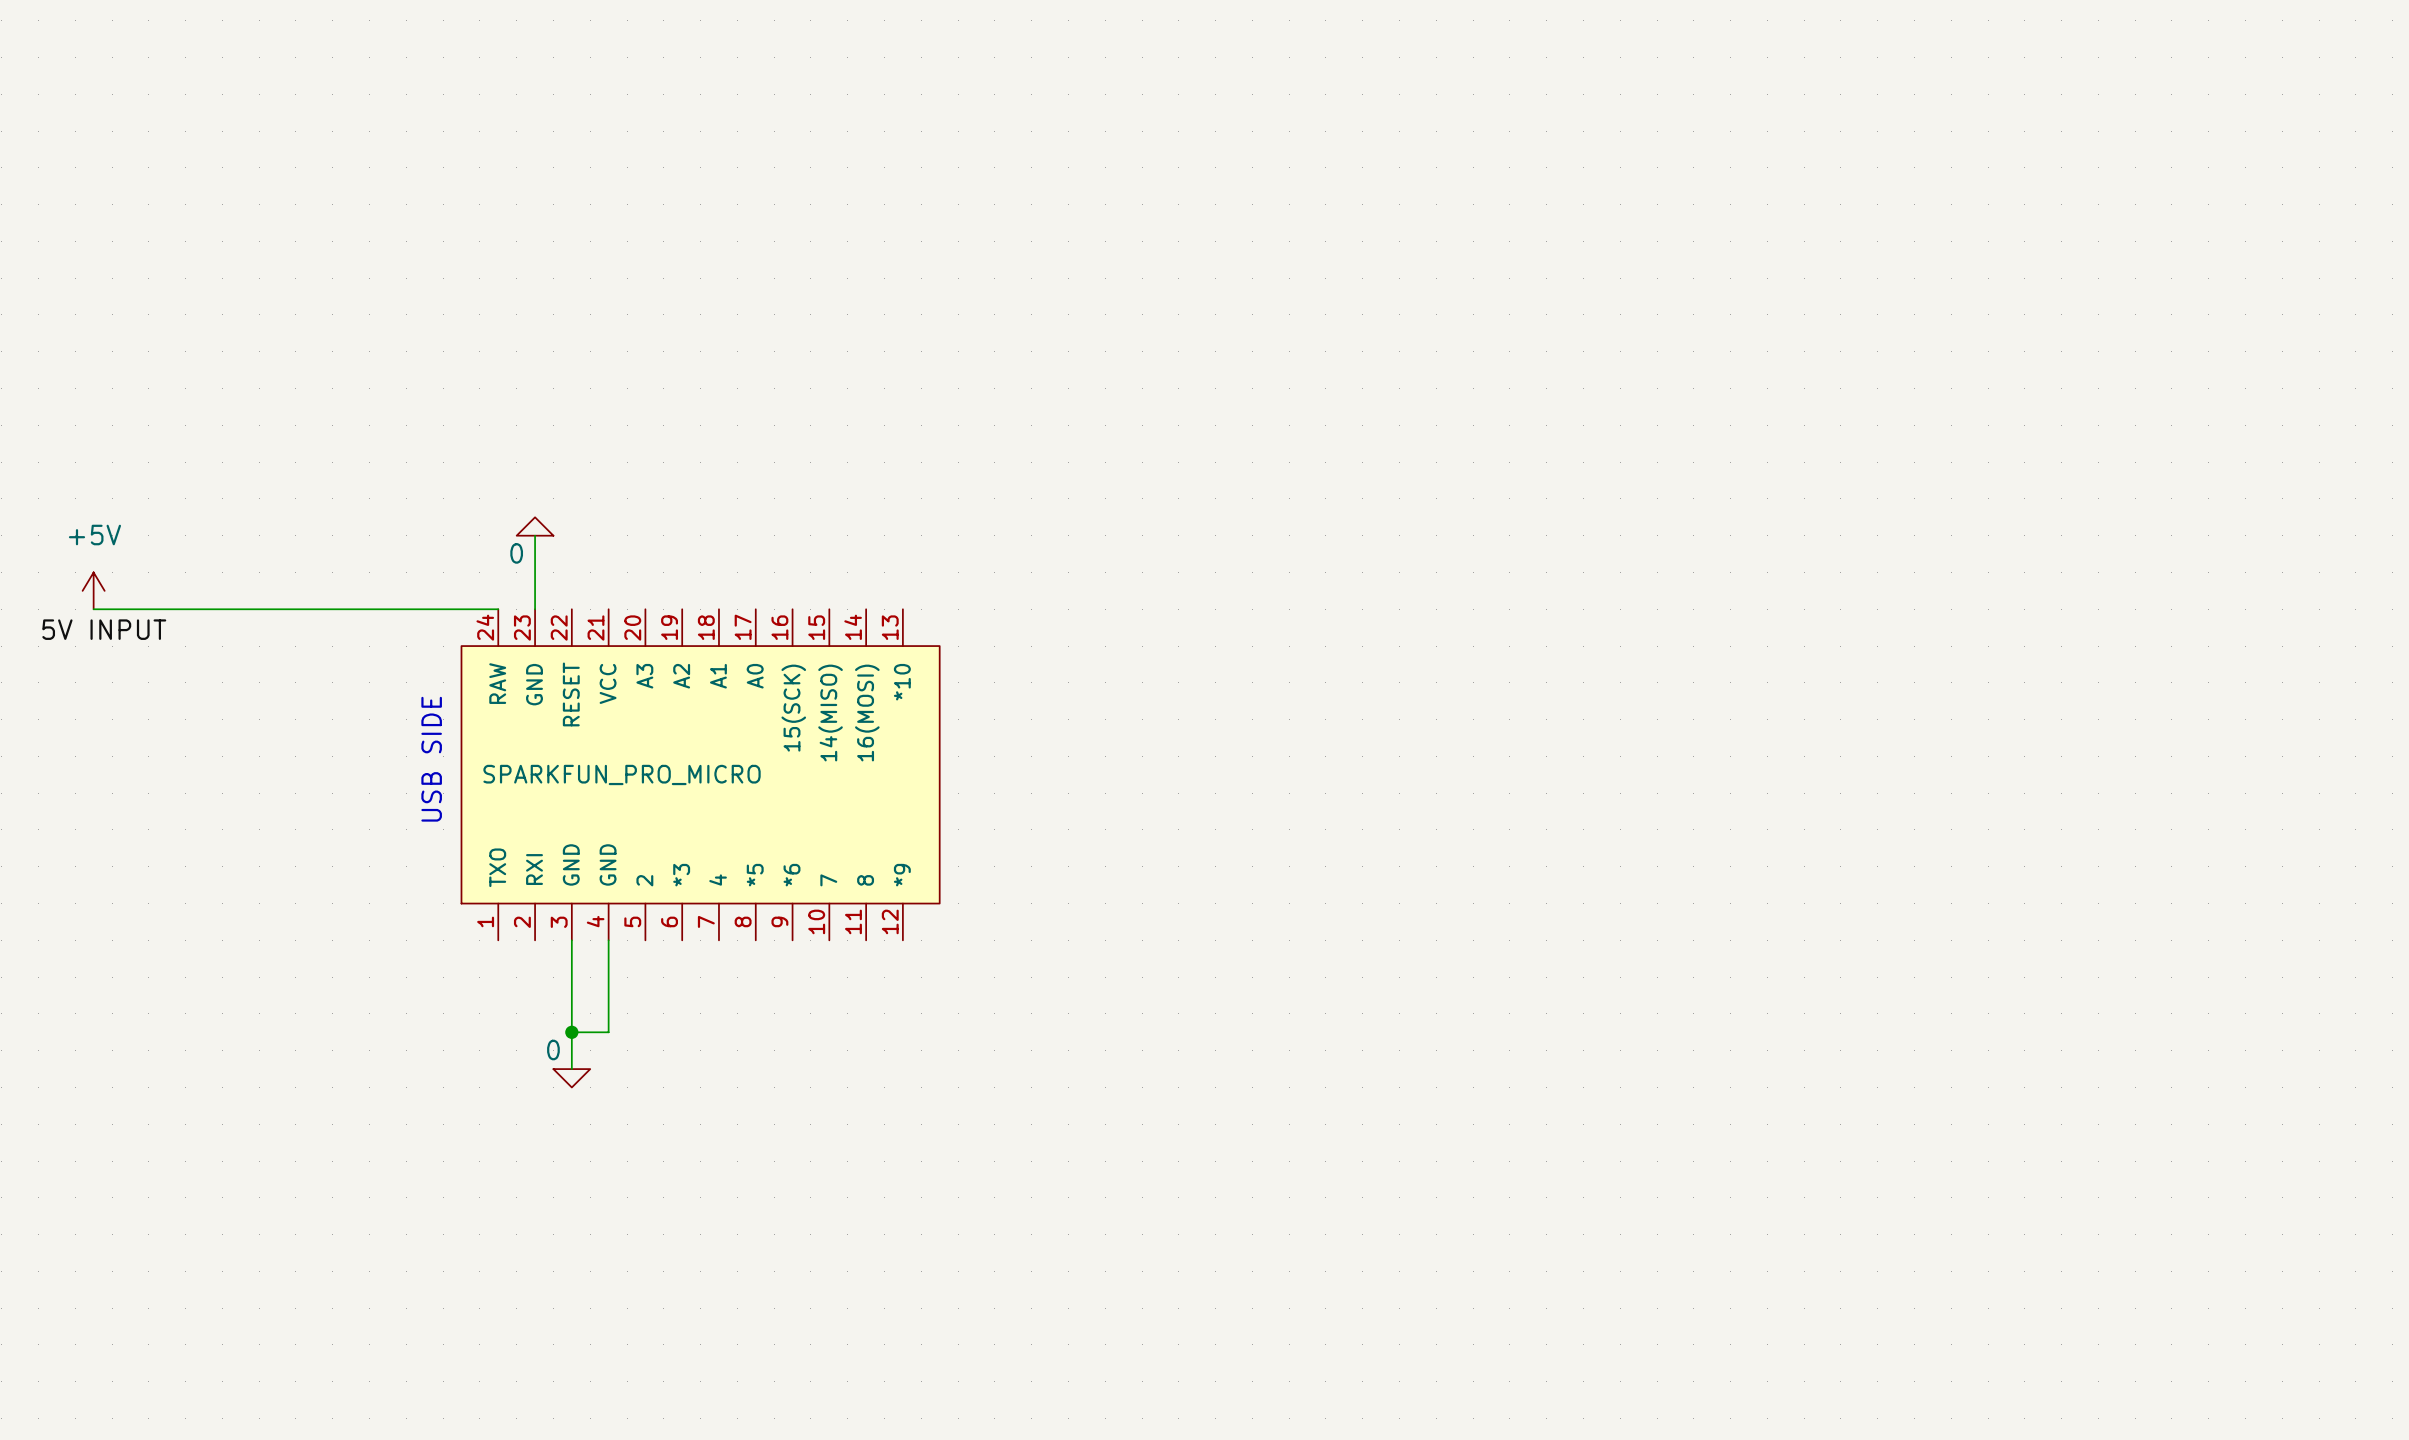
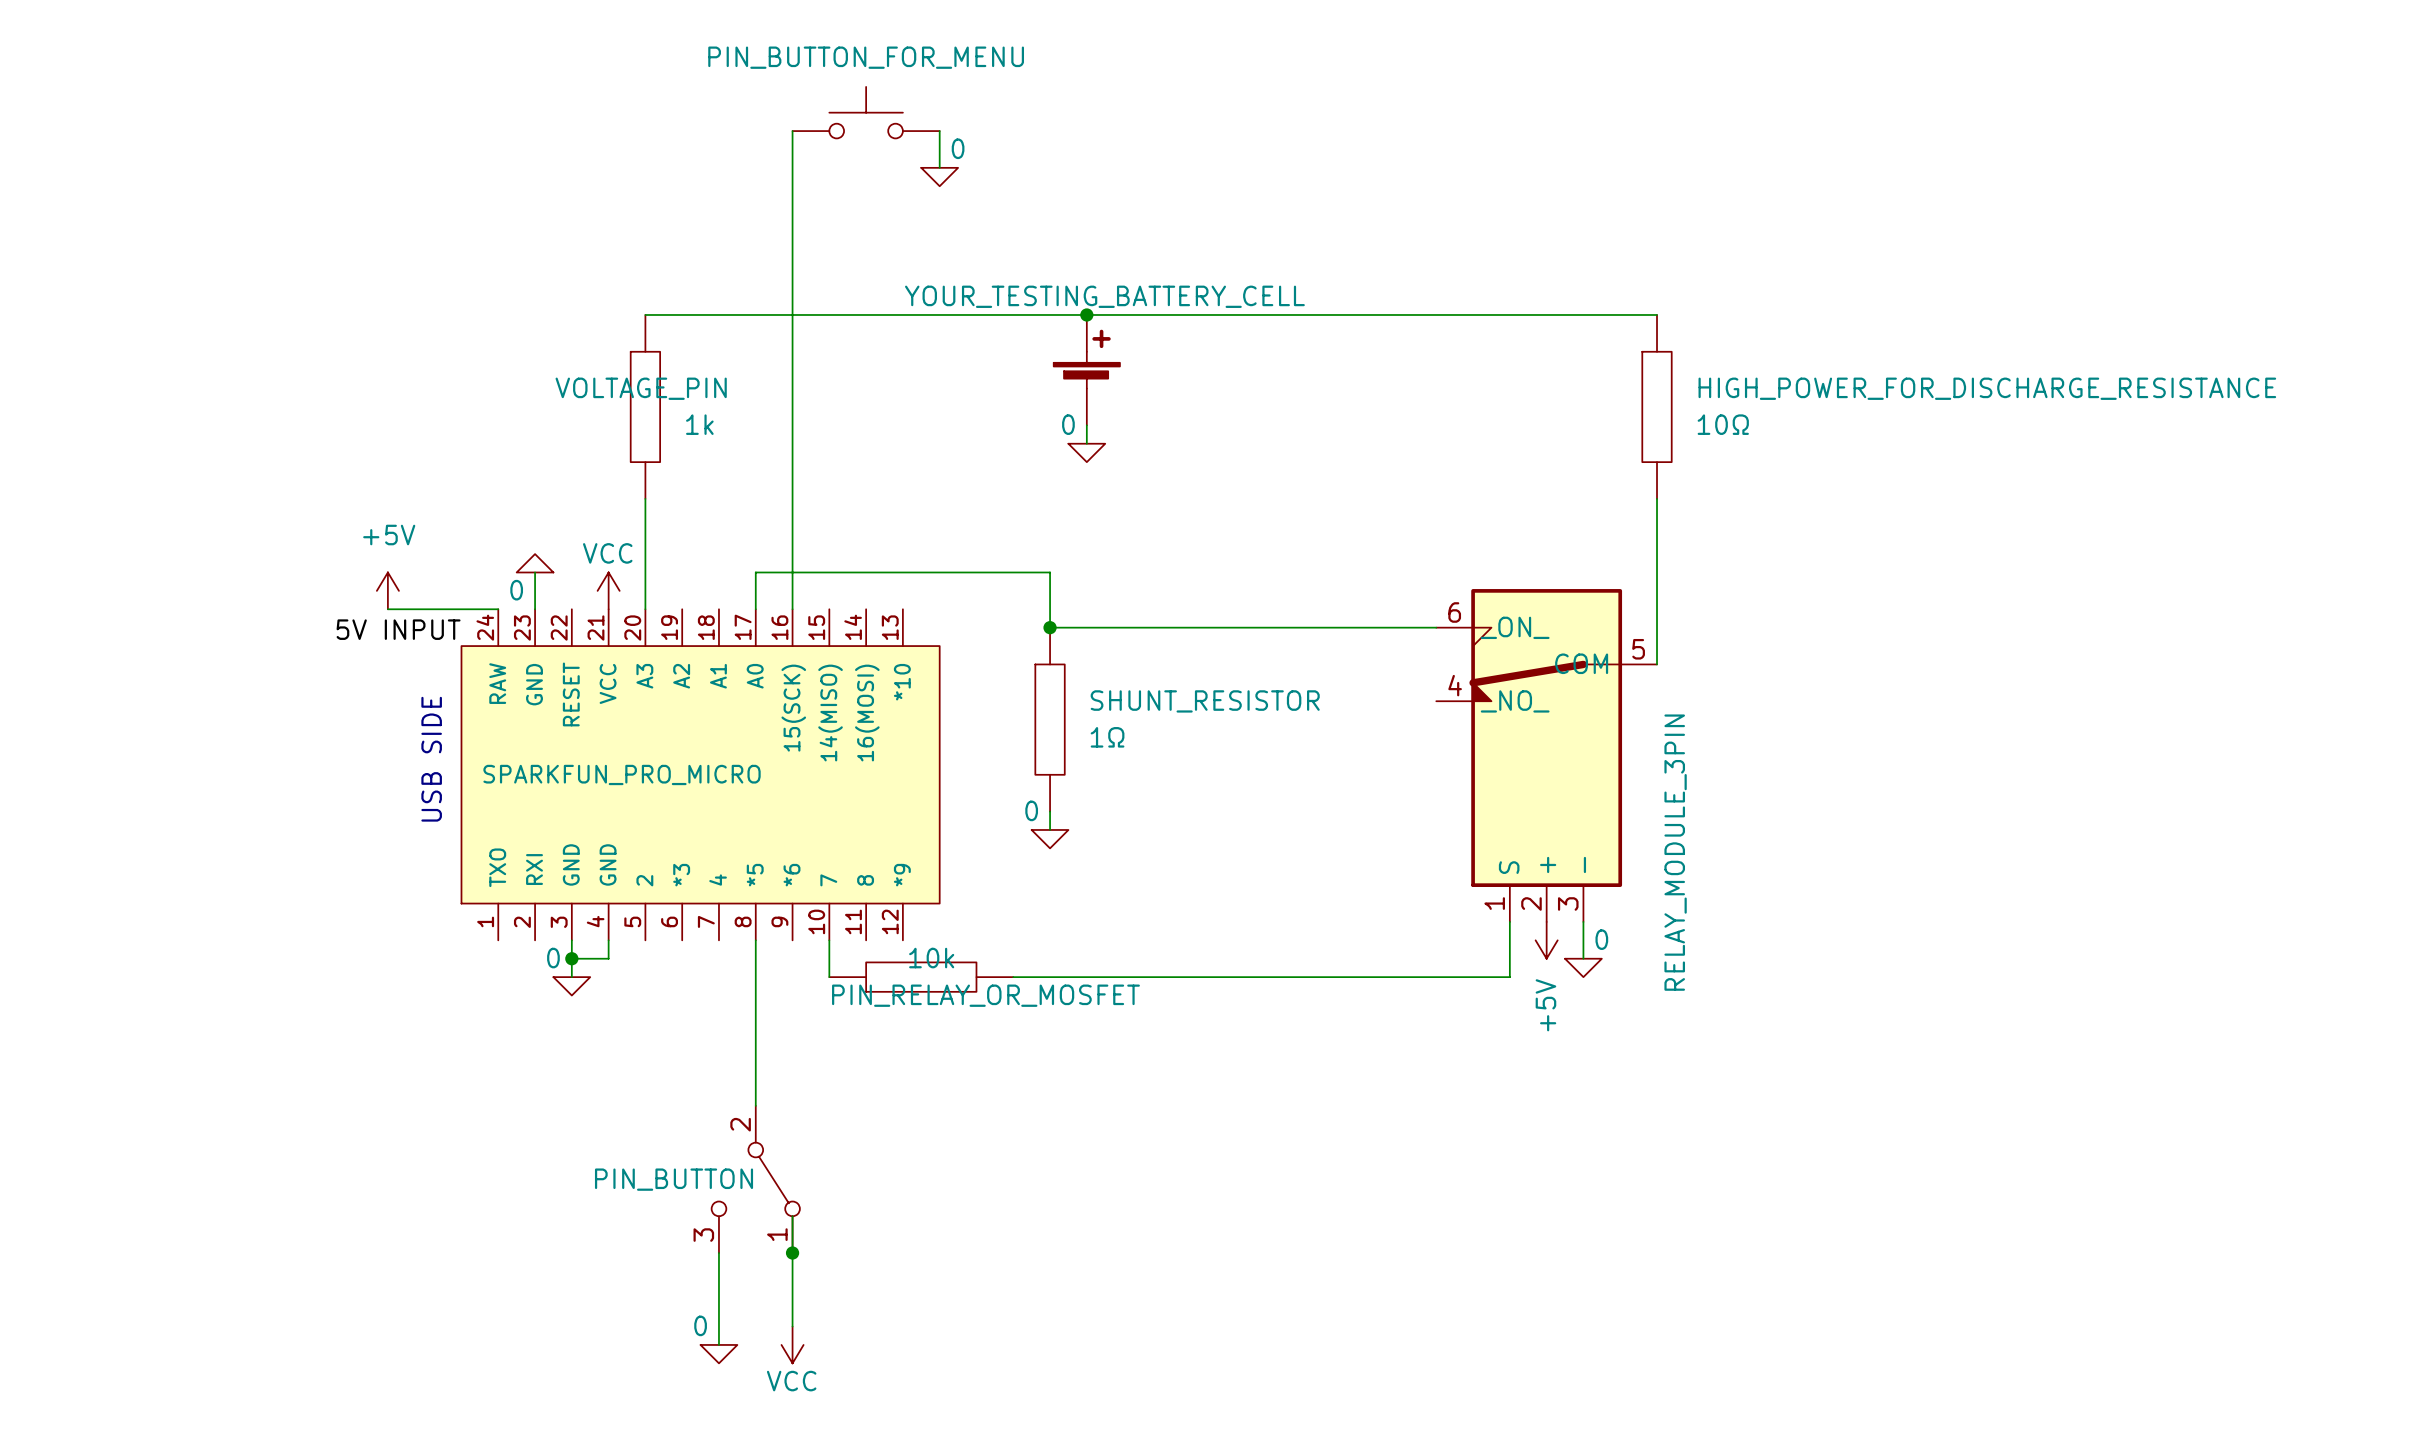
part: none -> PIN_BUTTON_FOR_MENU (866, 112)
wire: none -> (792, 131) (792, 609)
wire: none -> (939, 131) (939, 167)
power symbol: none -> 0 (939, 177)
wire: none -> (645, 314) (1657, 314)
junction: none -> (1086, 314)
part: none -> YOUR_TESTING_BATTERY_CELL (1086, 370)
VOLTAGE_PIN: none -> 1k (645, 406)
HIGH_POWER_FOR_DISCHARGE_RESISTANCE: none -> 10Ω (1657, 406)
wire: none -> (1086, 425) (1086, 443)
power symbol: none -> 0 (1086, 452)
wire: none -> (645, 498) (645, 609)
wire: none -> (1657, 498) (1657, 664)
power symbol position: 0 (535, 526) -> 0 (535, 563)
wire: (535, 535) (535, 572) -> none
power symbol position: +5V (93, 590) -> +5V (387, 590)
power symbol: none -> VCC (608, 590)
wire: (93, 609) (387, 609) -> none
wire: none -> (755, 609) (755, 572) (1050, 572) (1050, 627) (1436, 627)
junction: none -> (1050, 627)
label position: 5V INPUT (104, 629) -> 5V INPUT (398, 629)
SHUNT_RESISTOR: none -> 1Ω (1050, 719)
part: none -> RELAY_MODULE_3PIN (1546, 755)
wire: none -> (1050, 811) (1050, 829)
power symbol: none -> 0 (1050, 839)
wire: none -> (1509, 921) (1509, 977) (1013, 977)
wire: none -> (1583, 921) (1583, 958)
wire: none -> (755, 940) (755, 1105)
wire: none -> (829, 940) (829, 977)
power symbol: none -> +5V (1546, 940)
wire: (608, 958) (608, 1032) (571, 1032) -> (608, 958) (571, 958)
power symbol: none -> 0 (1583, 967)
wire: (571, 977) (571, 1069) -> (718, 1253) (718, 1344)
PIN_RELAY_OR_MOSFET: none -> 10k (921, 977)
junction position: (571, 1032) -> (571, 958)
power symbol position: 0 (571, 1078) -> 0 (571, 986)
part: none -> PIN_BUTTON (755, 1179)
wire: none -> (792, 1216) (792, 1326)
junction: none -> (792, 1253)
power symbol: none -> VCC (792, 1344)
power symbol: none -> 0 (718, 1354)

